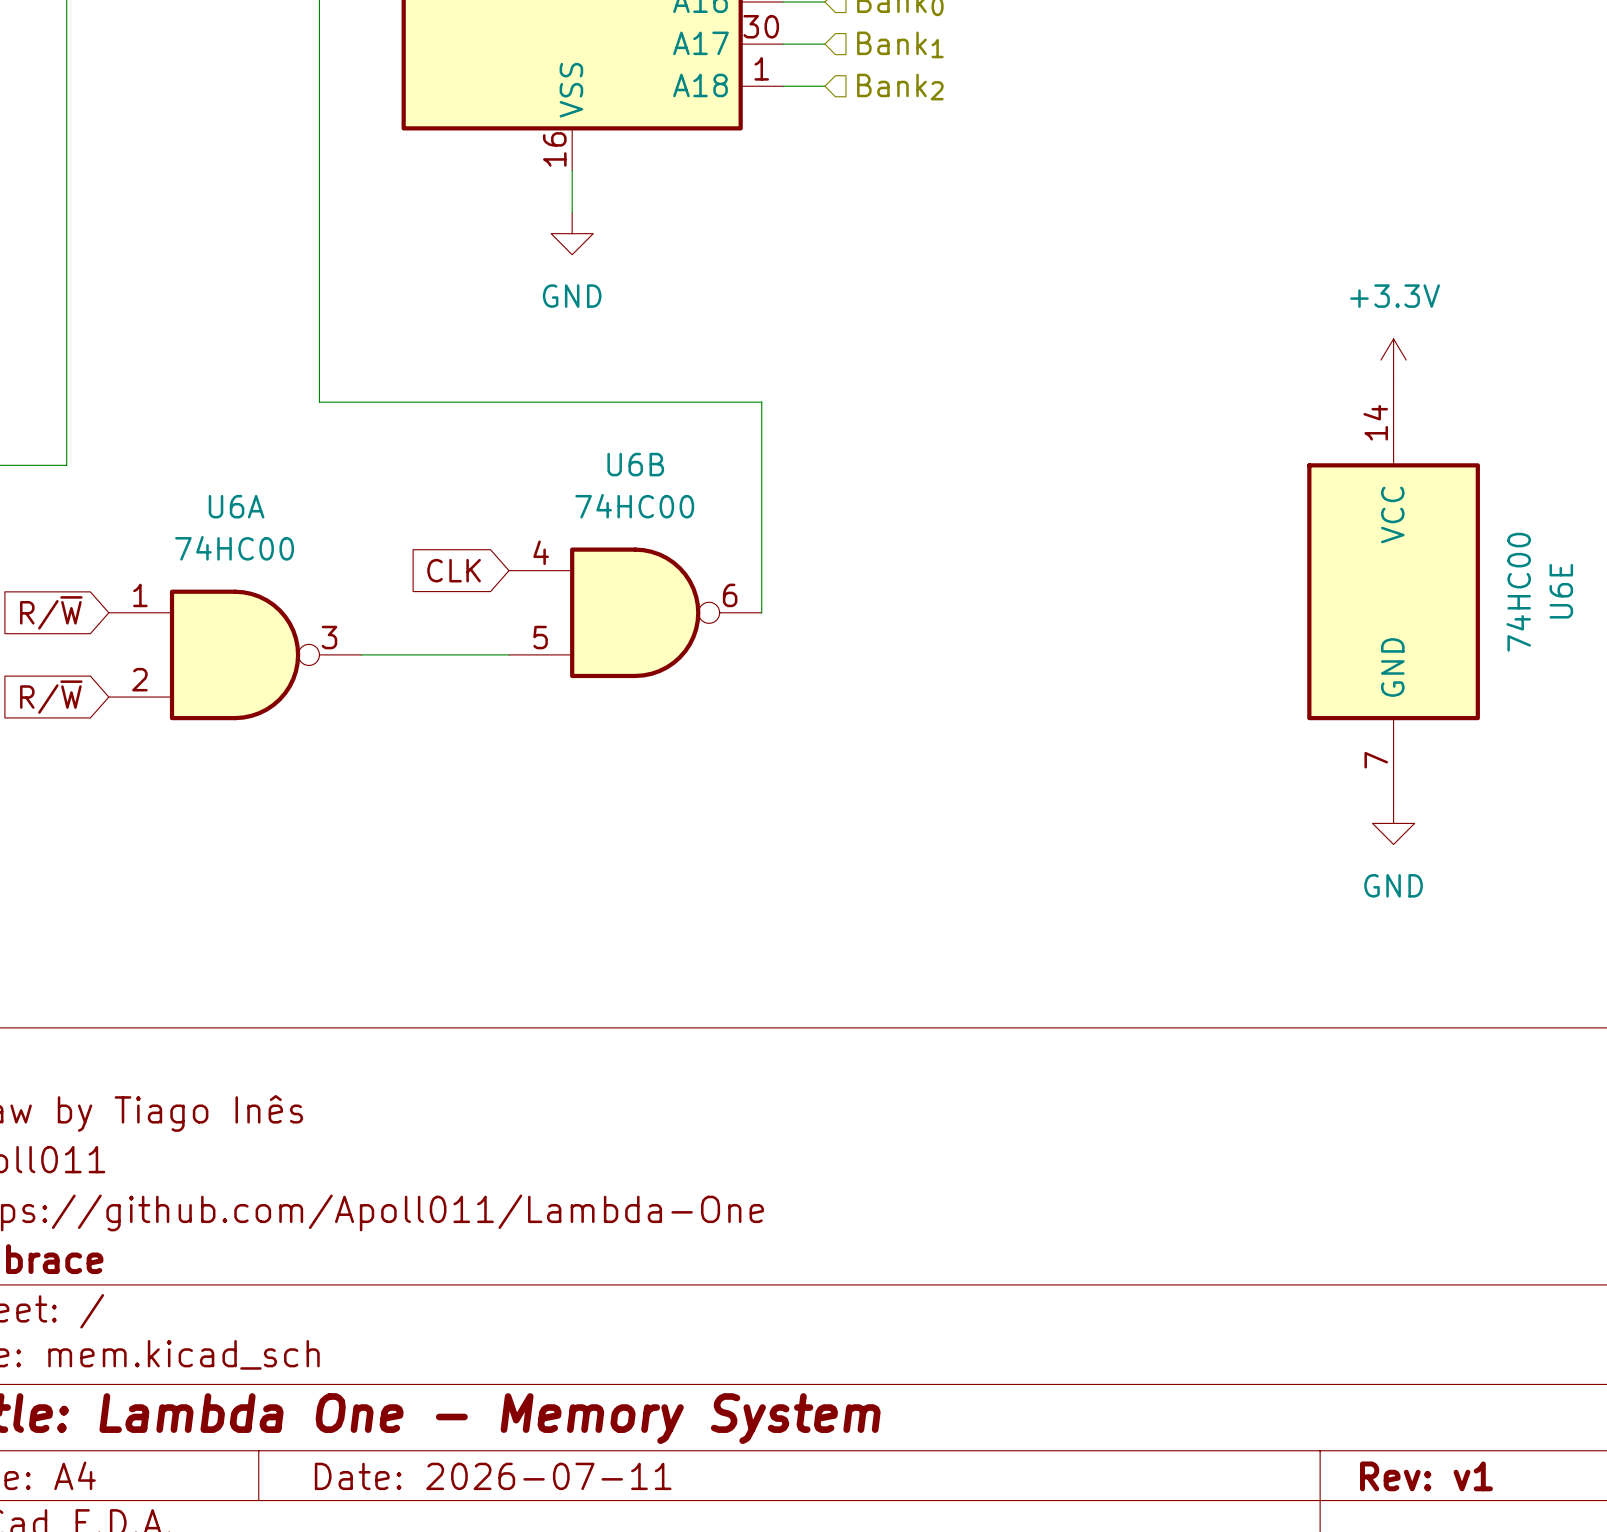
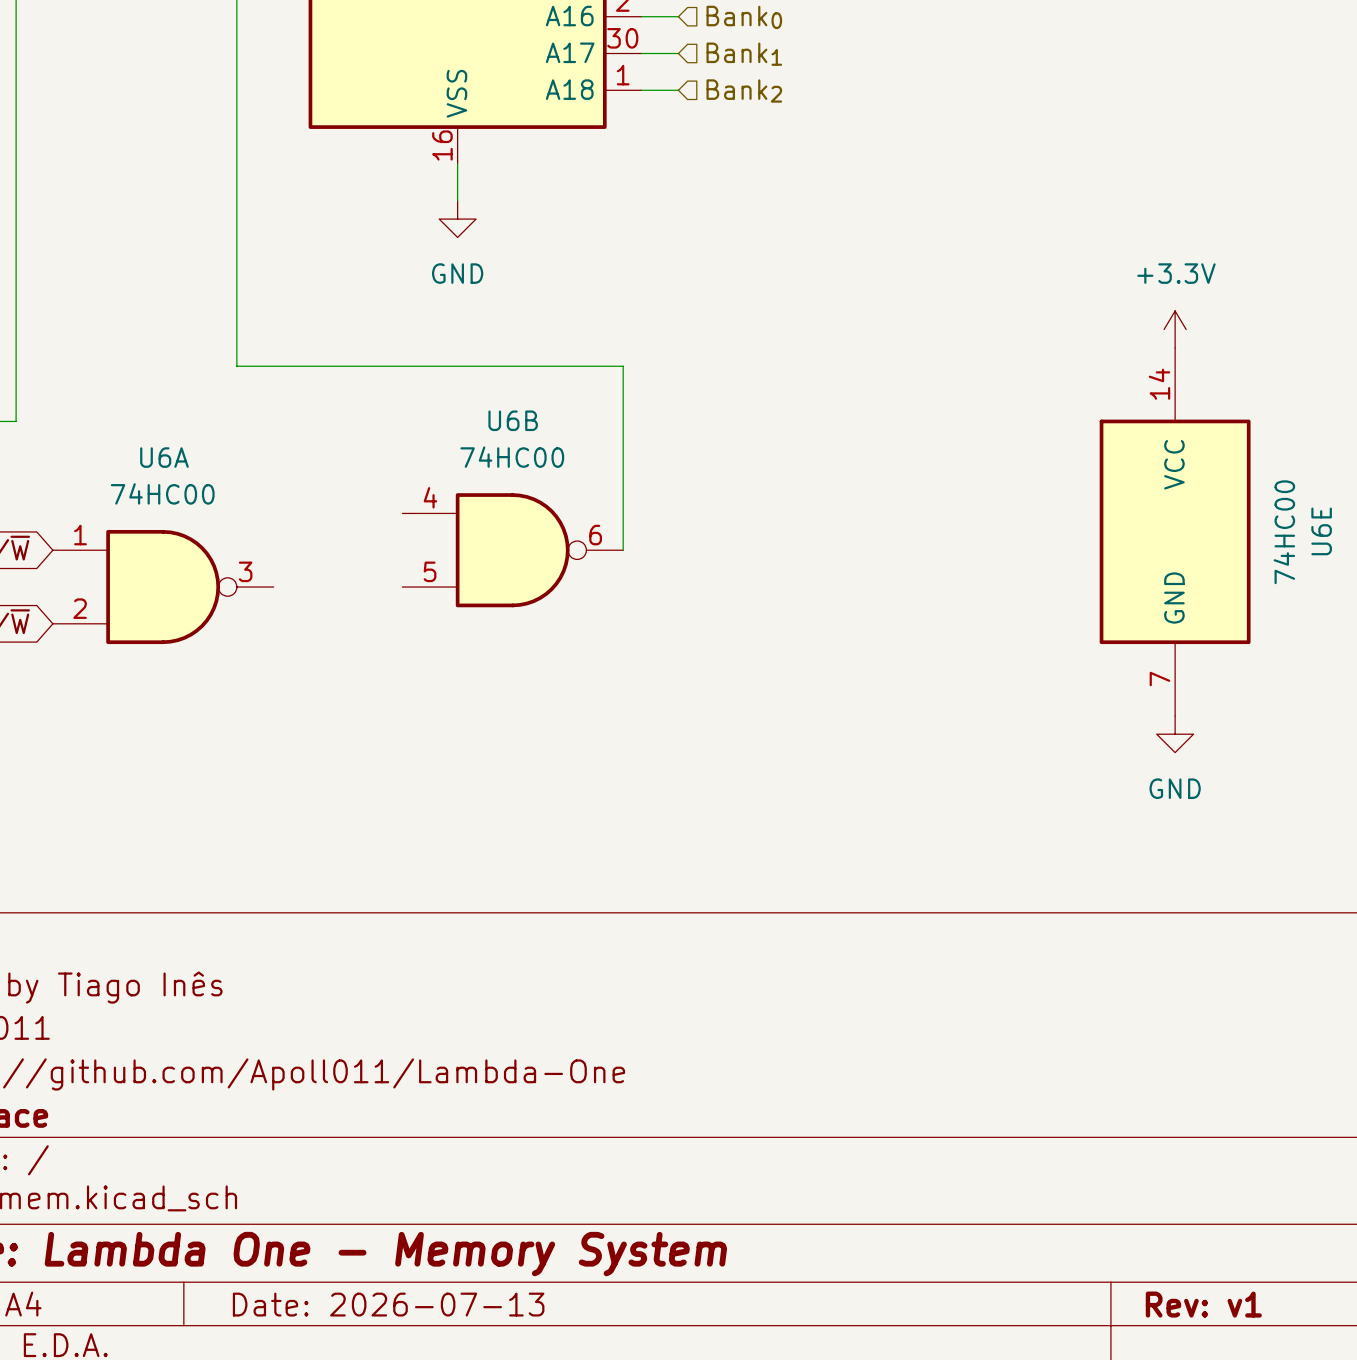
global label: CLK (454, 570) -> none
wire: (361, 654) (509, 654) -> none
title block: Date: 2026-07-11 (493, 1476) -> Date: 2026-07-13 (388, 1304)

